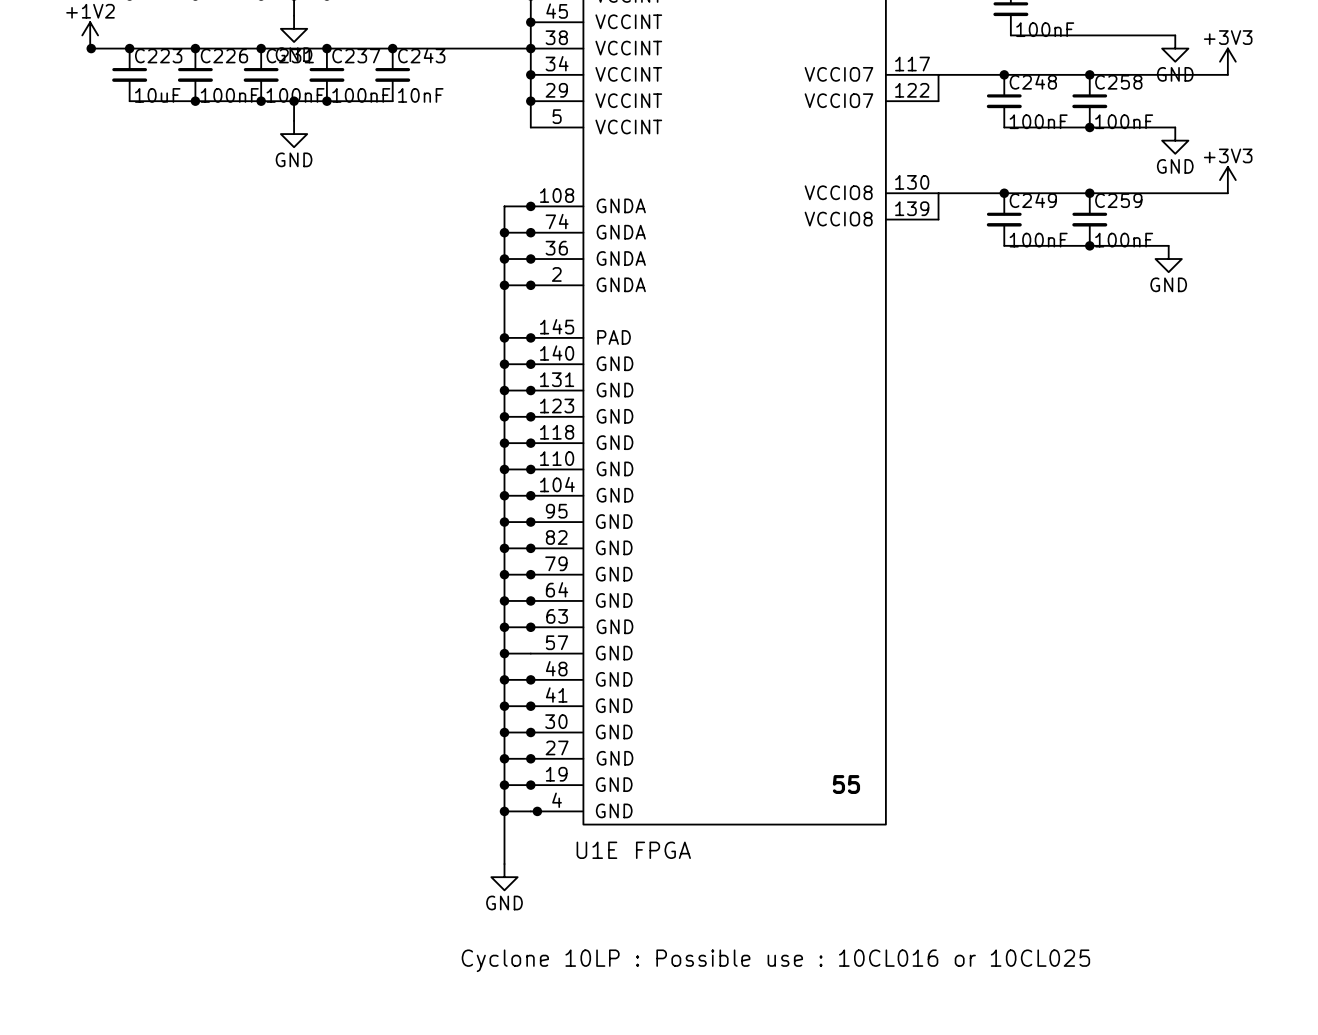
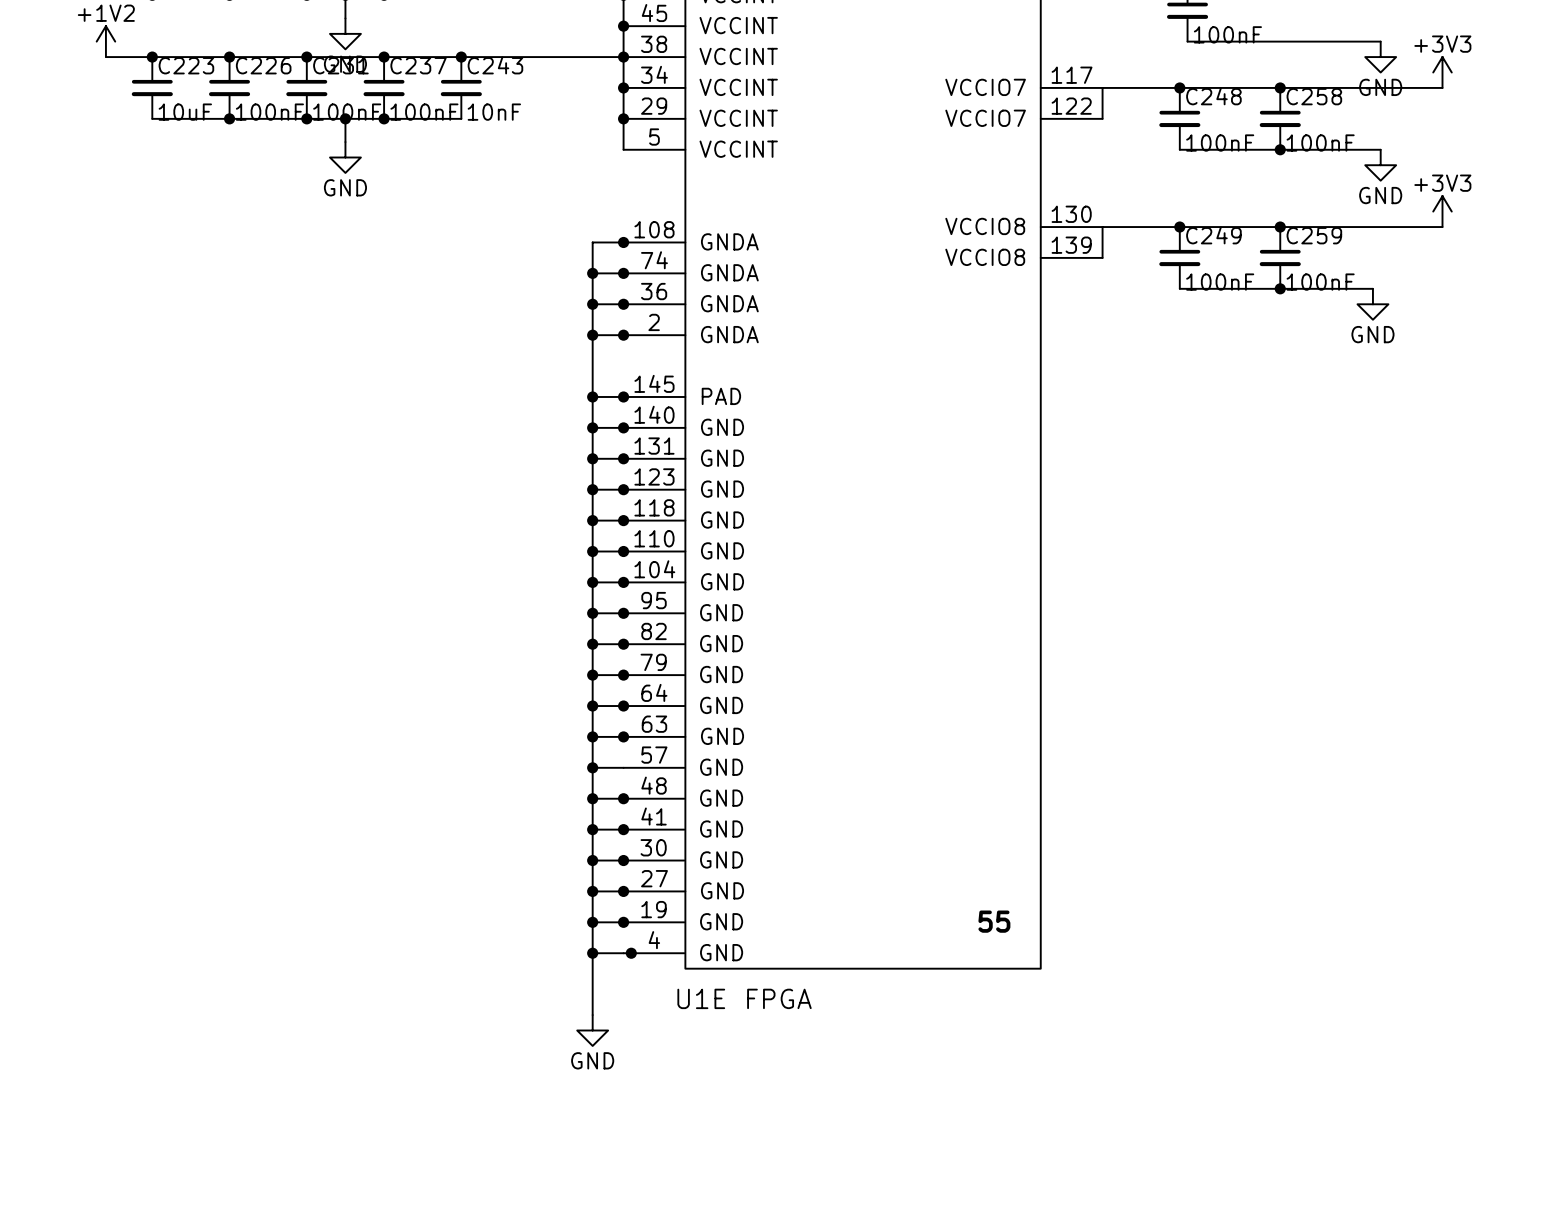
junction: (91, 48) -> none
text: Cyclone 10LP : Possible use : 10CL016 or 10CL025 (775, 960) -> none

